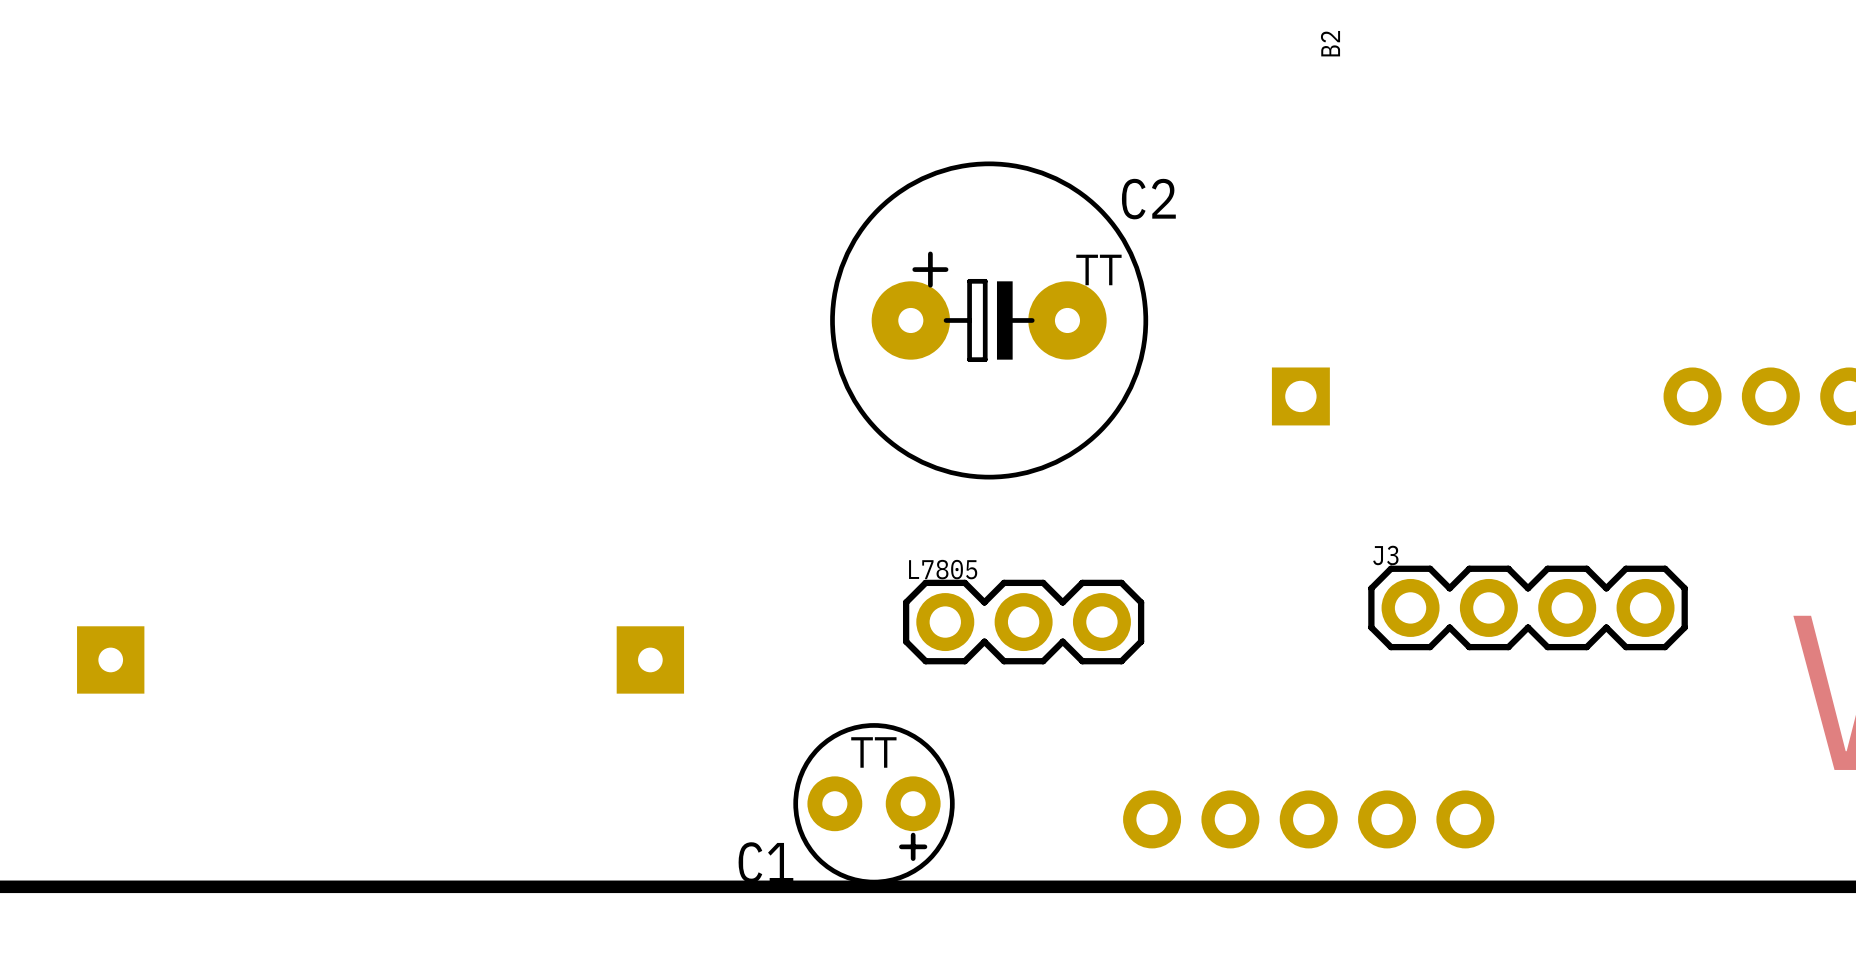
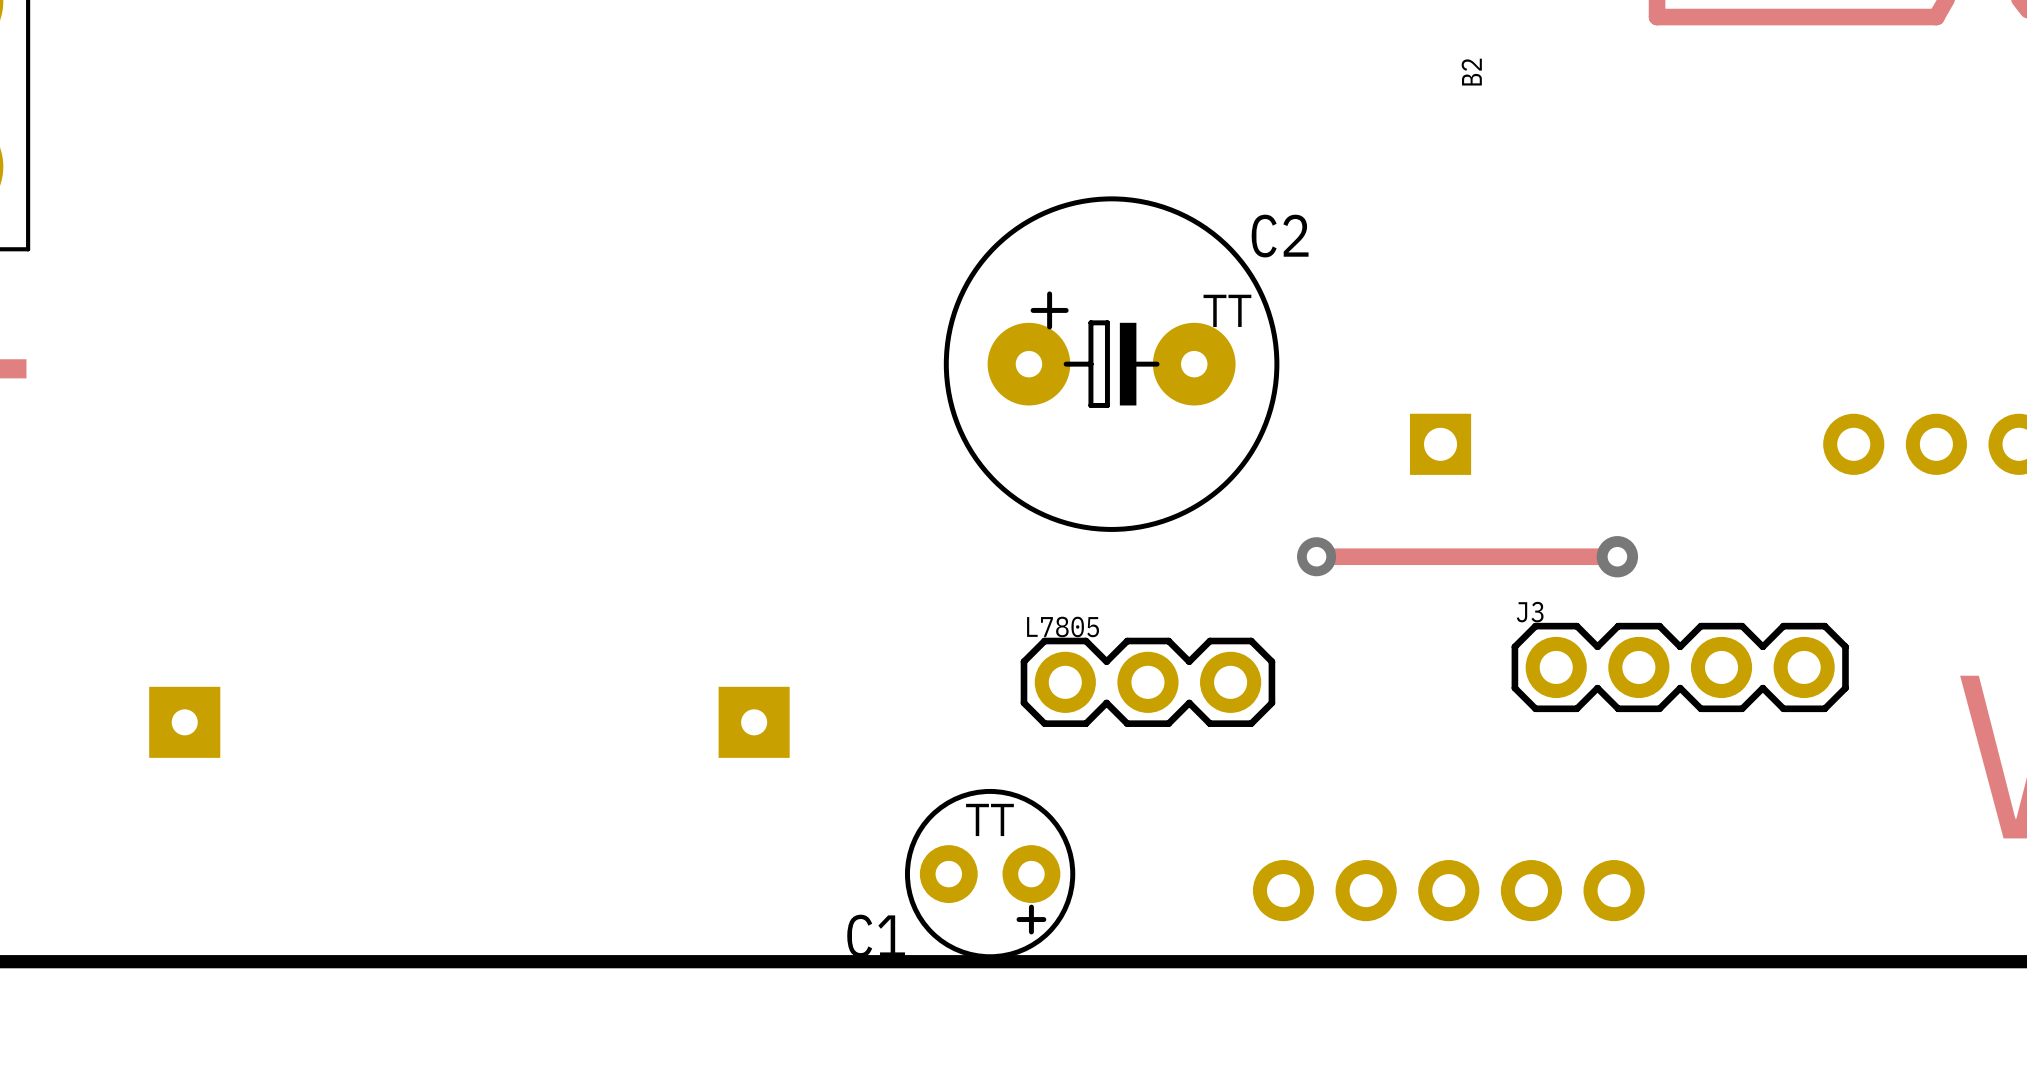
track: none -> (1316, 556) (1617, 556)
via: none -> (1316, 556)
via: none -> (1617, 556)

